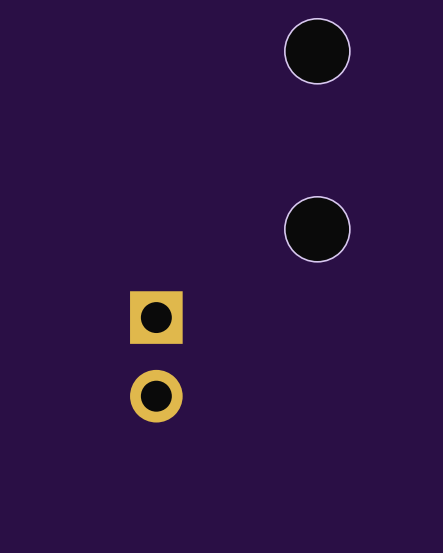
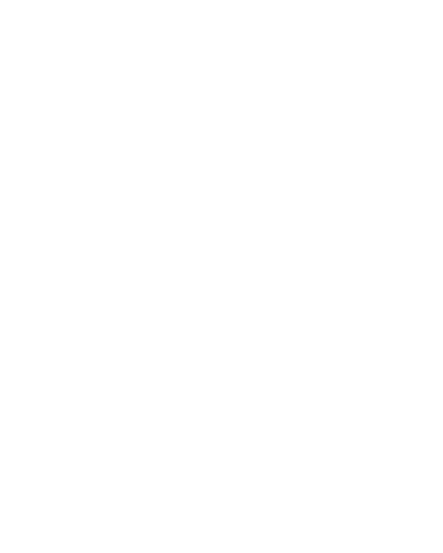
part: (317, 51) -> none
part: (317, 229) -> none
part: (156, 356) -> none

